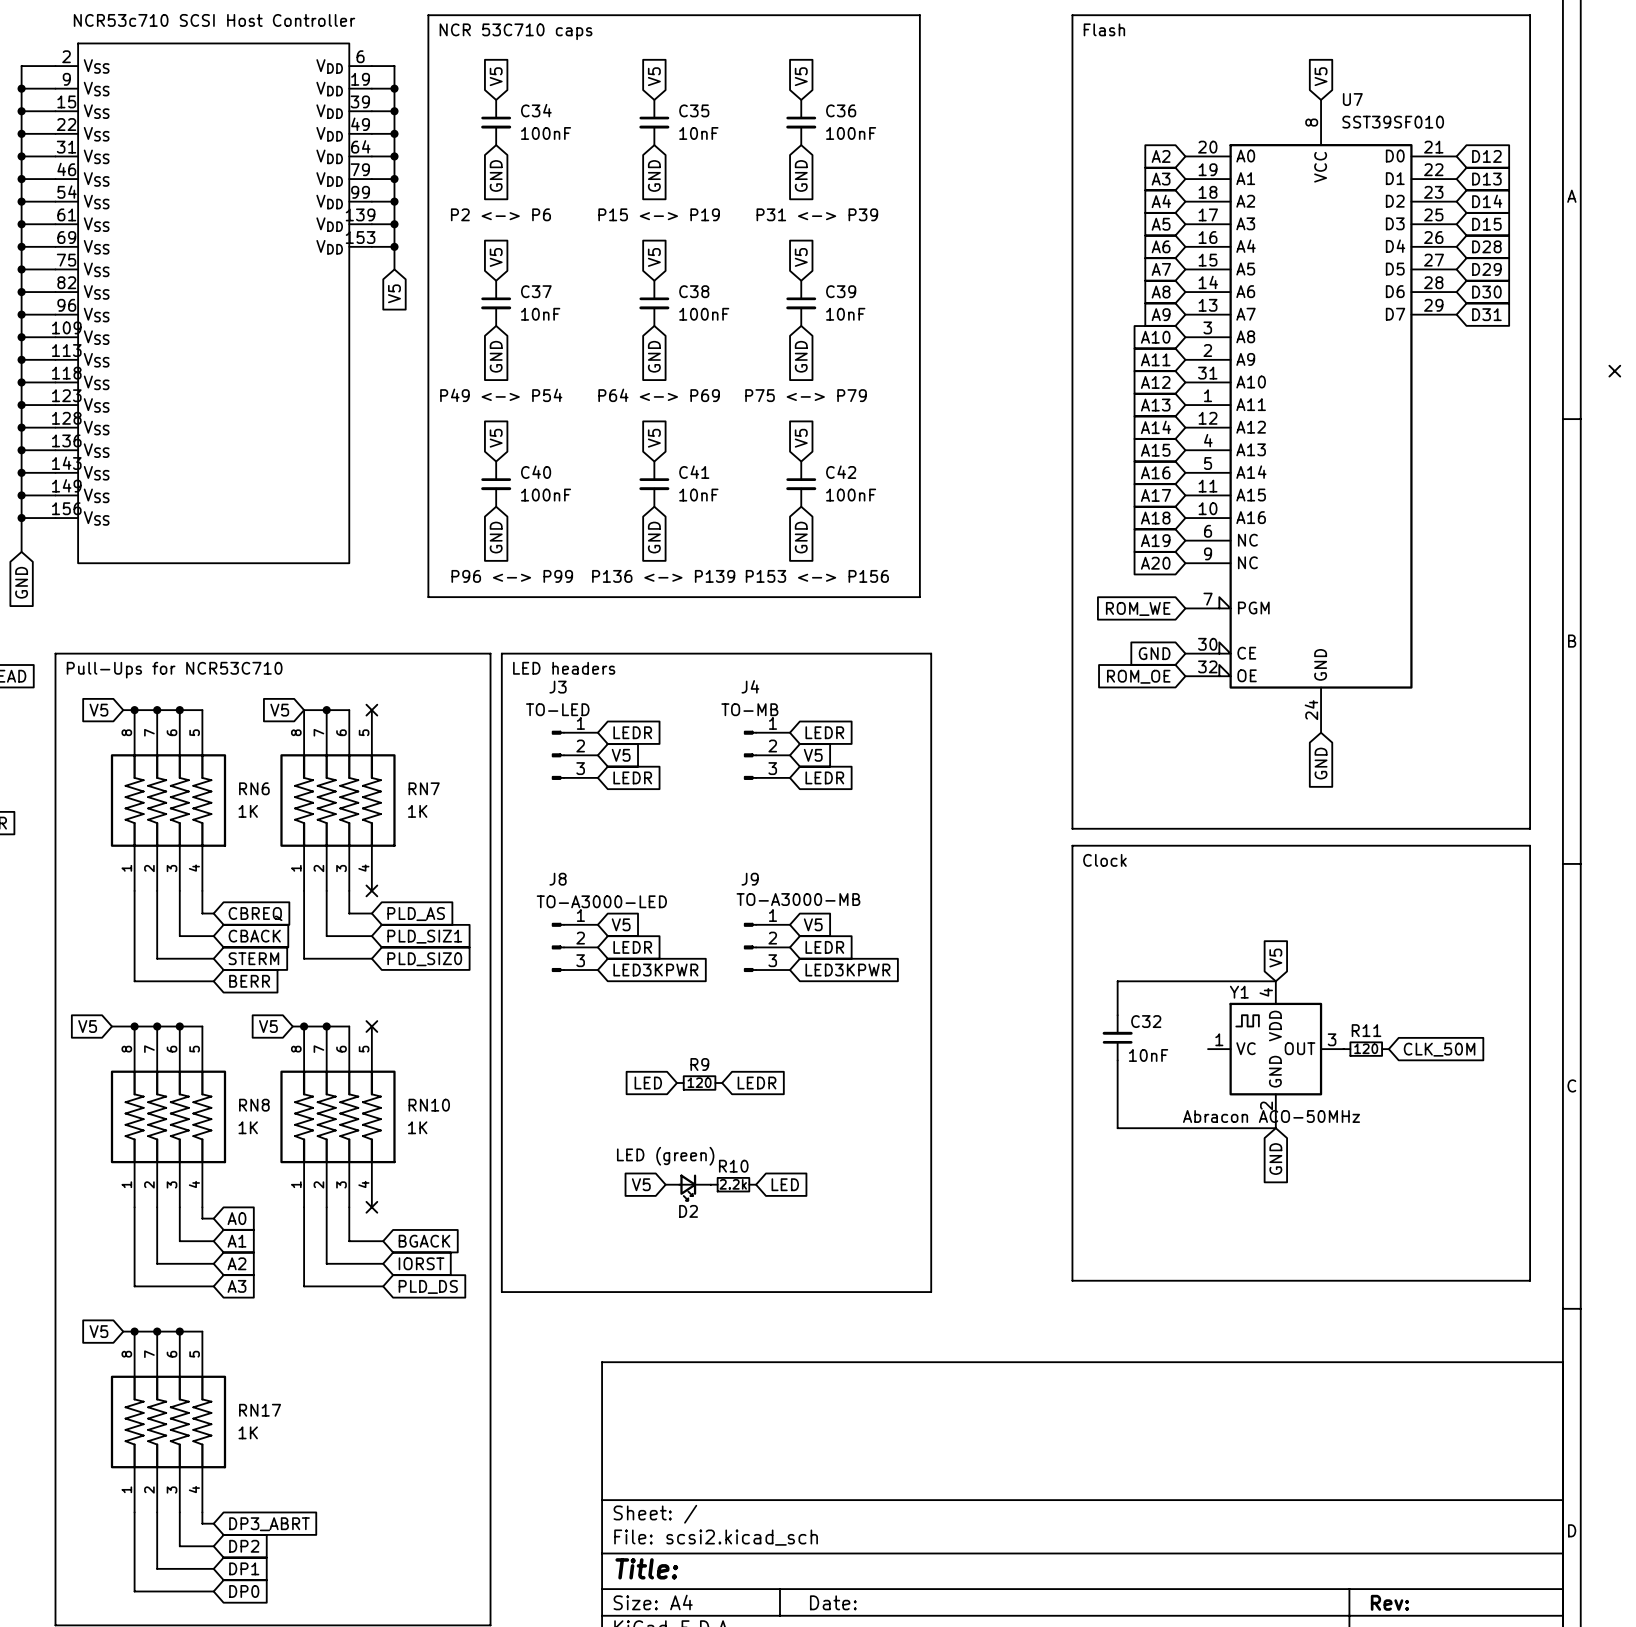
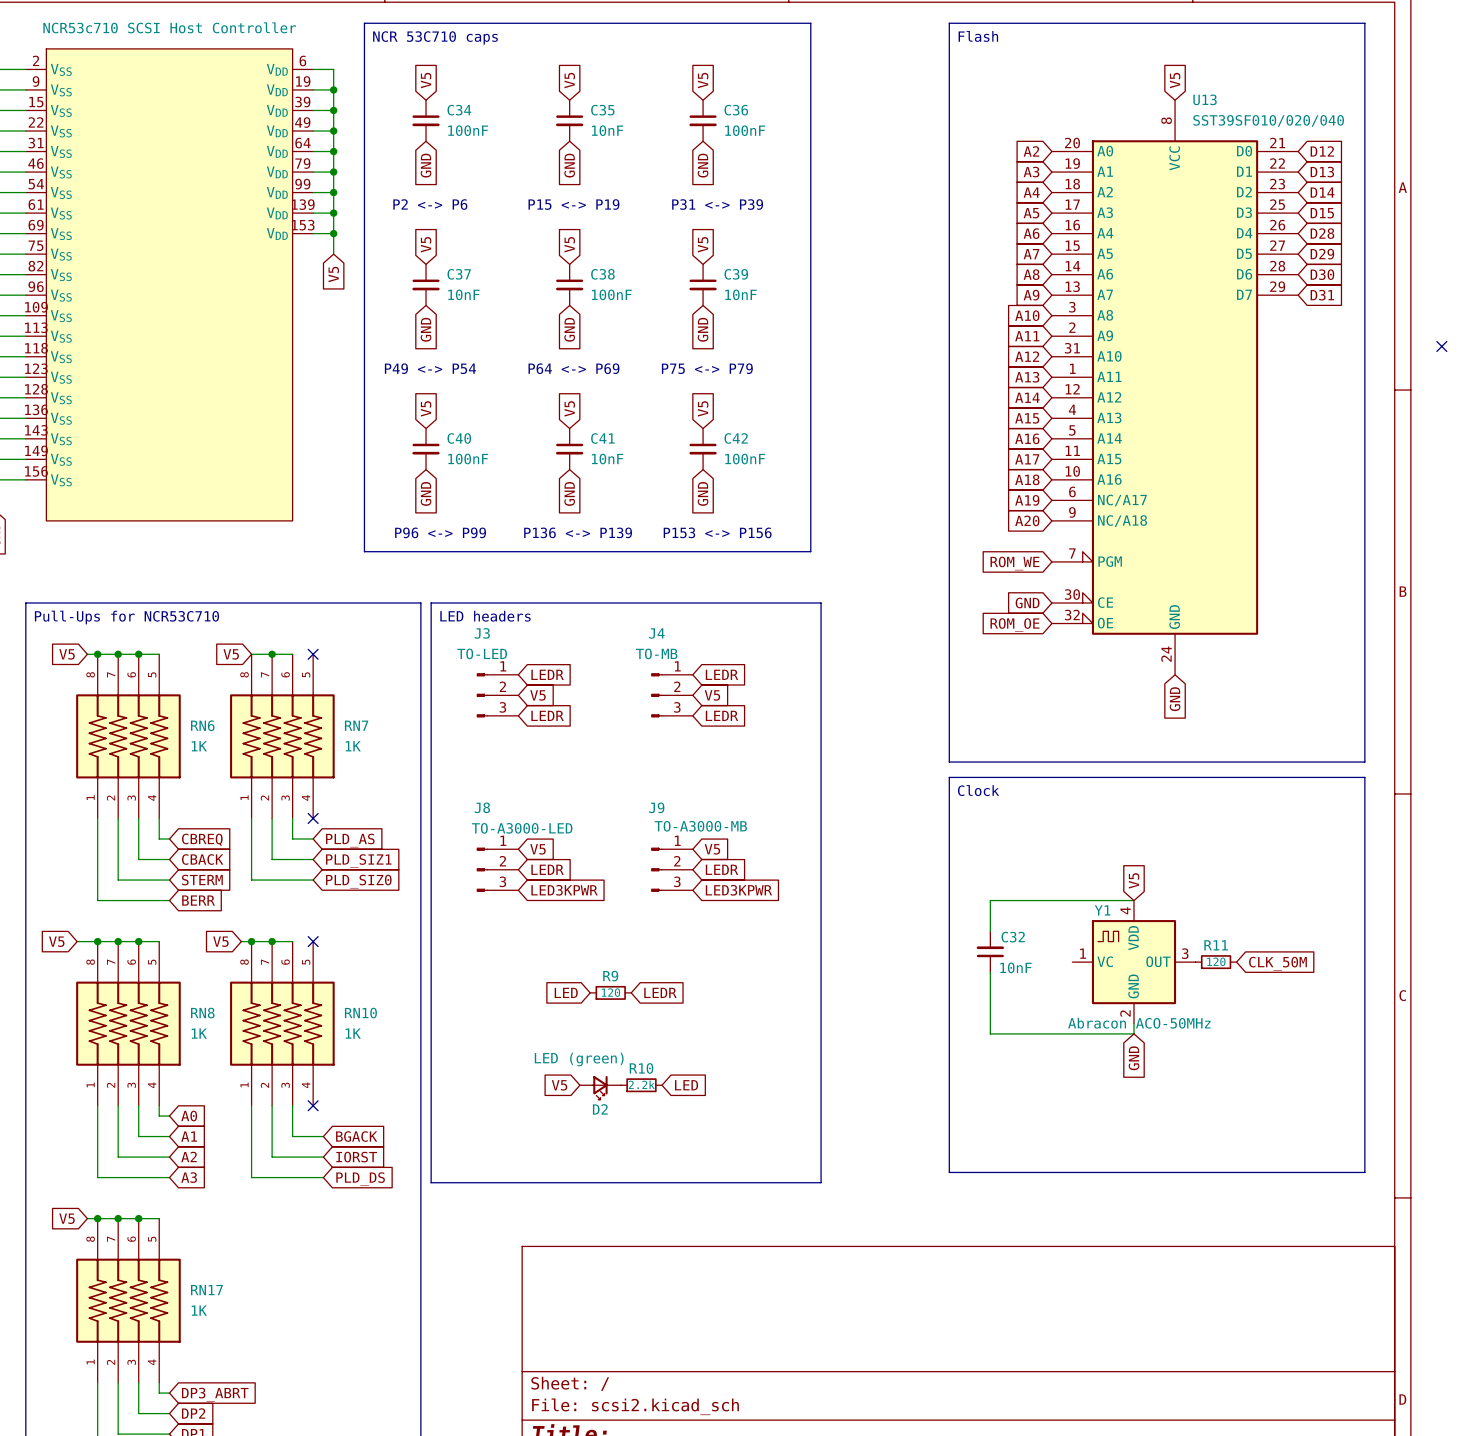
U7 name: U7 (1352, 99) -> U13 (1205, 99)
U7 value: SST39SF010 (1393, 122) -> SST39SF010/020/040 (1268, 120)
U7 pin name: NC (1247, 540) -> NC/A17 (1122, 500)
U7 pin name: NC (1247, 562) -> NC/A18 (1122, 521)

